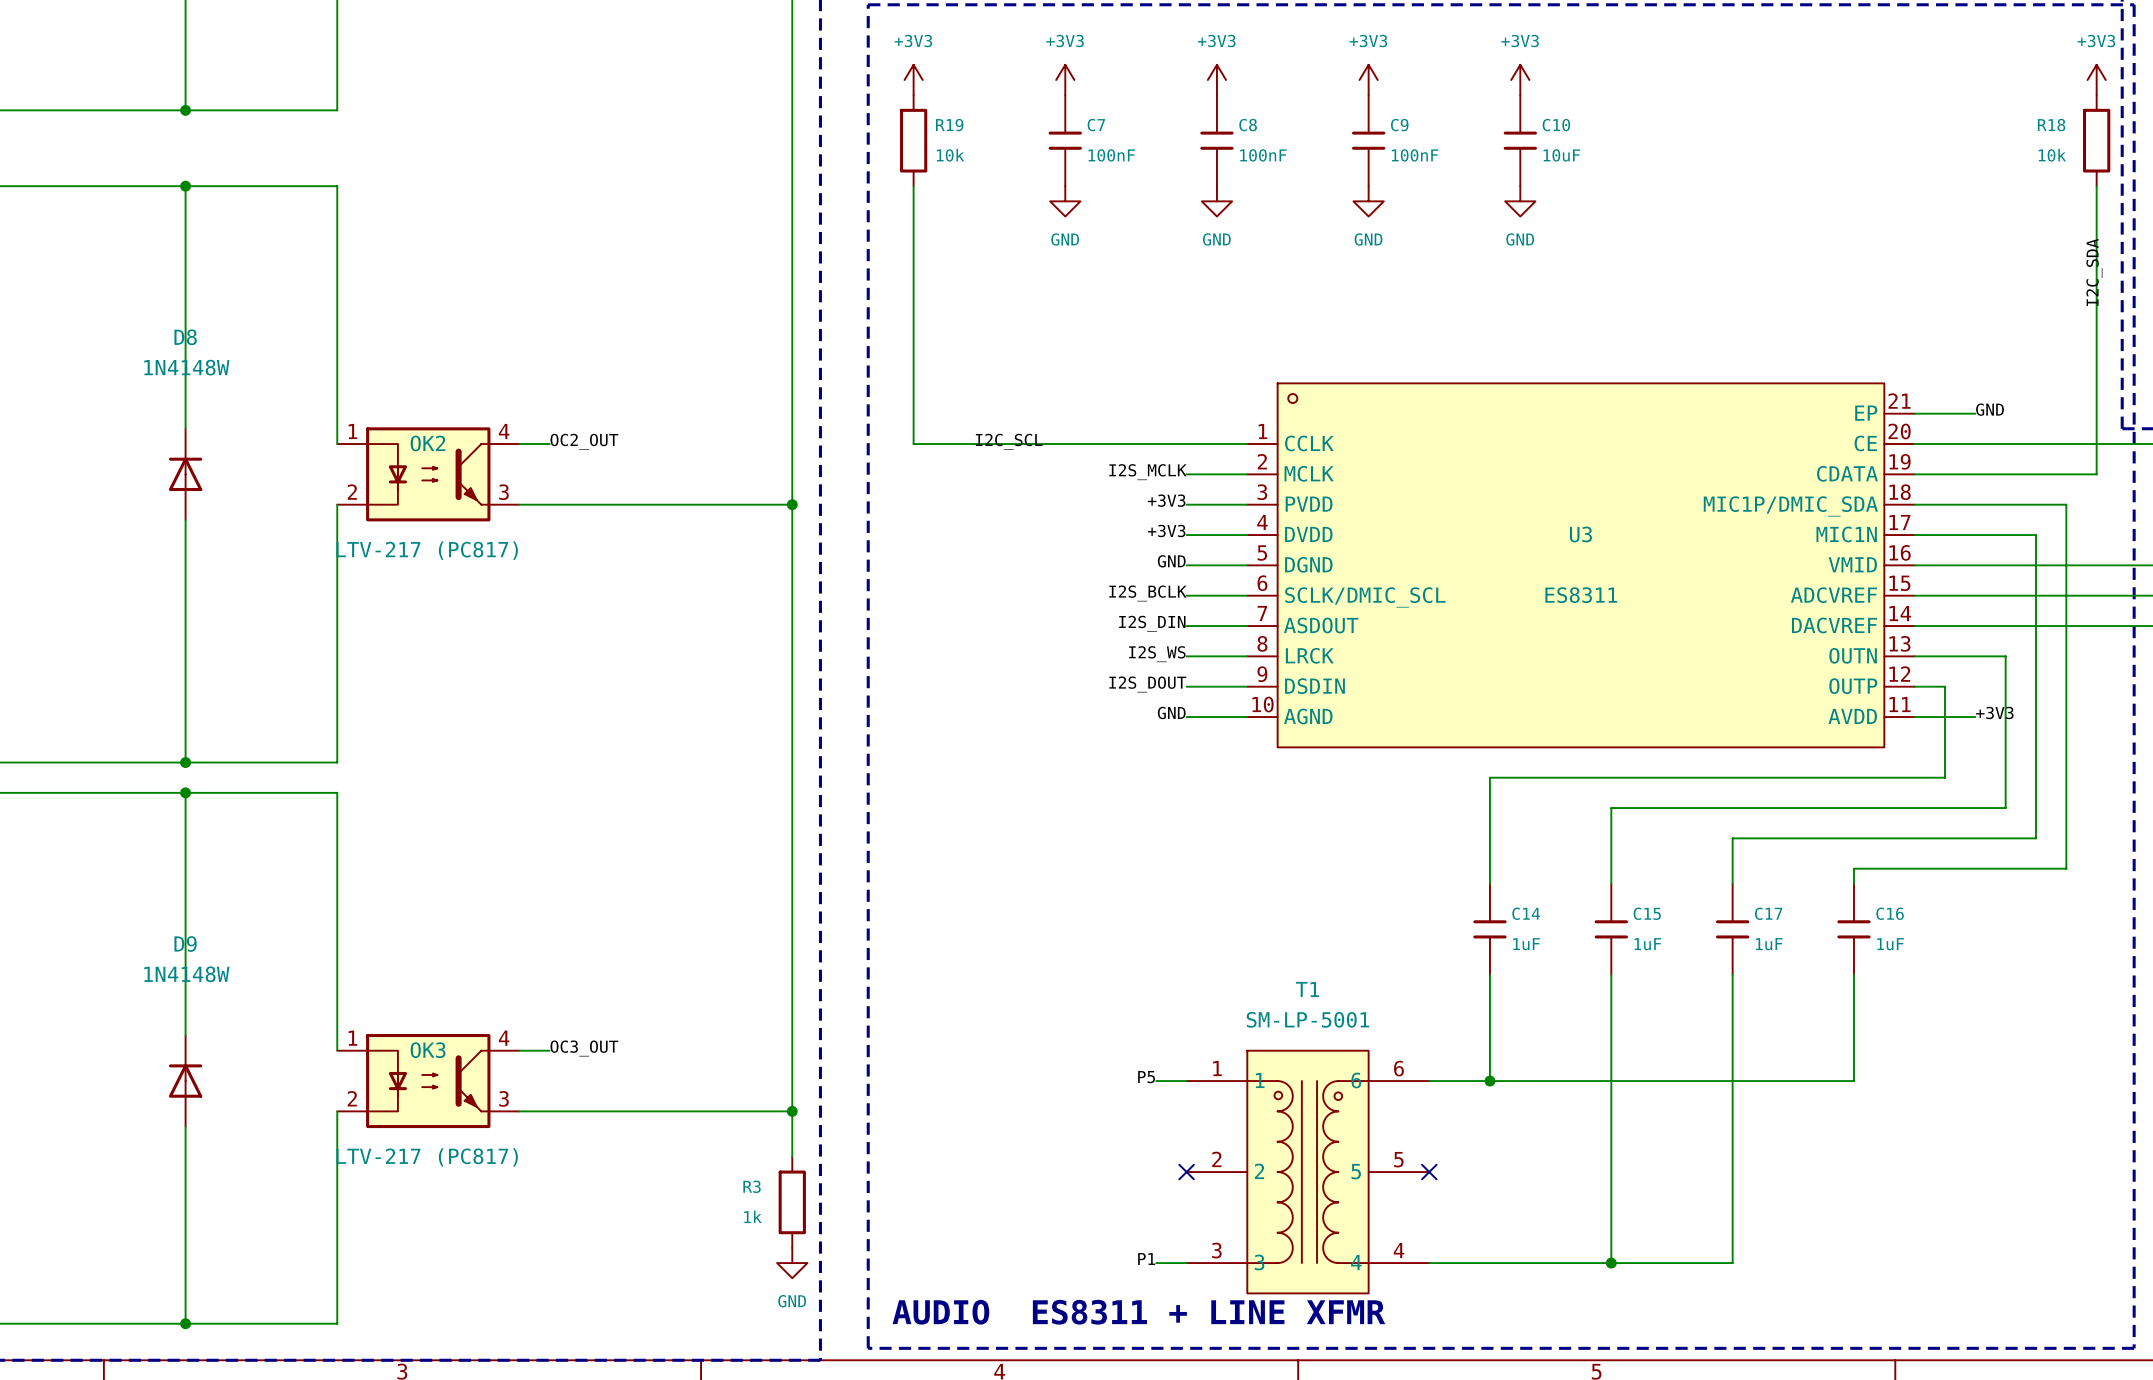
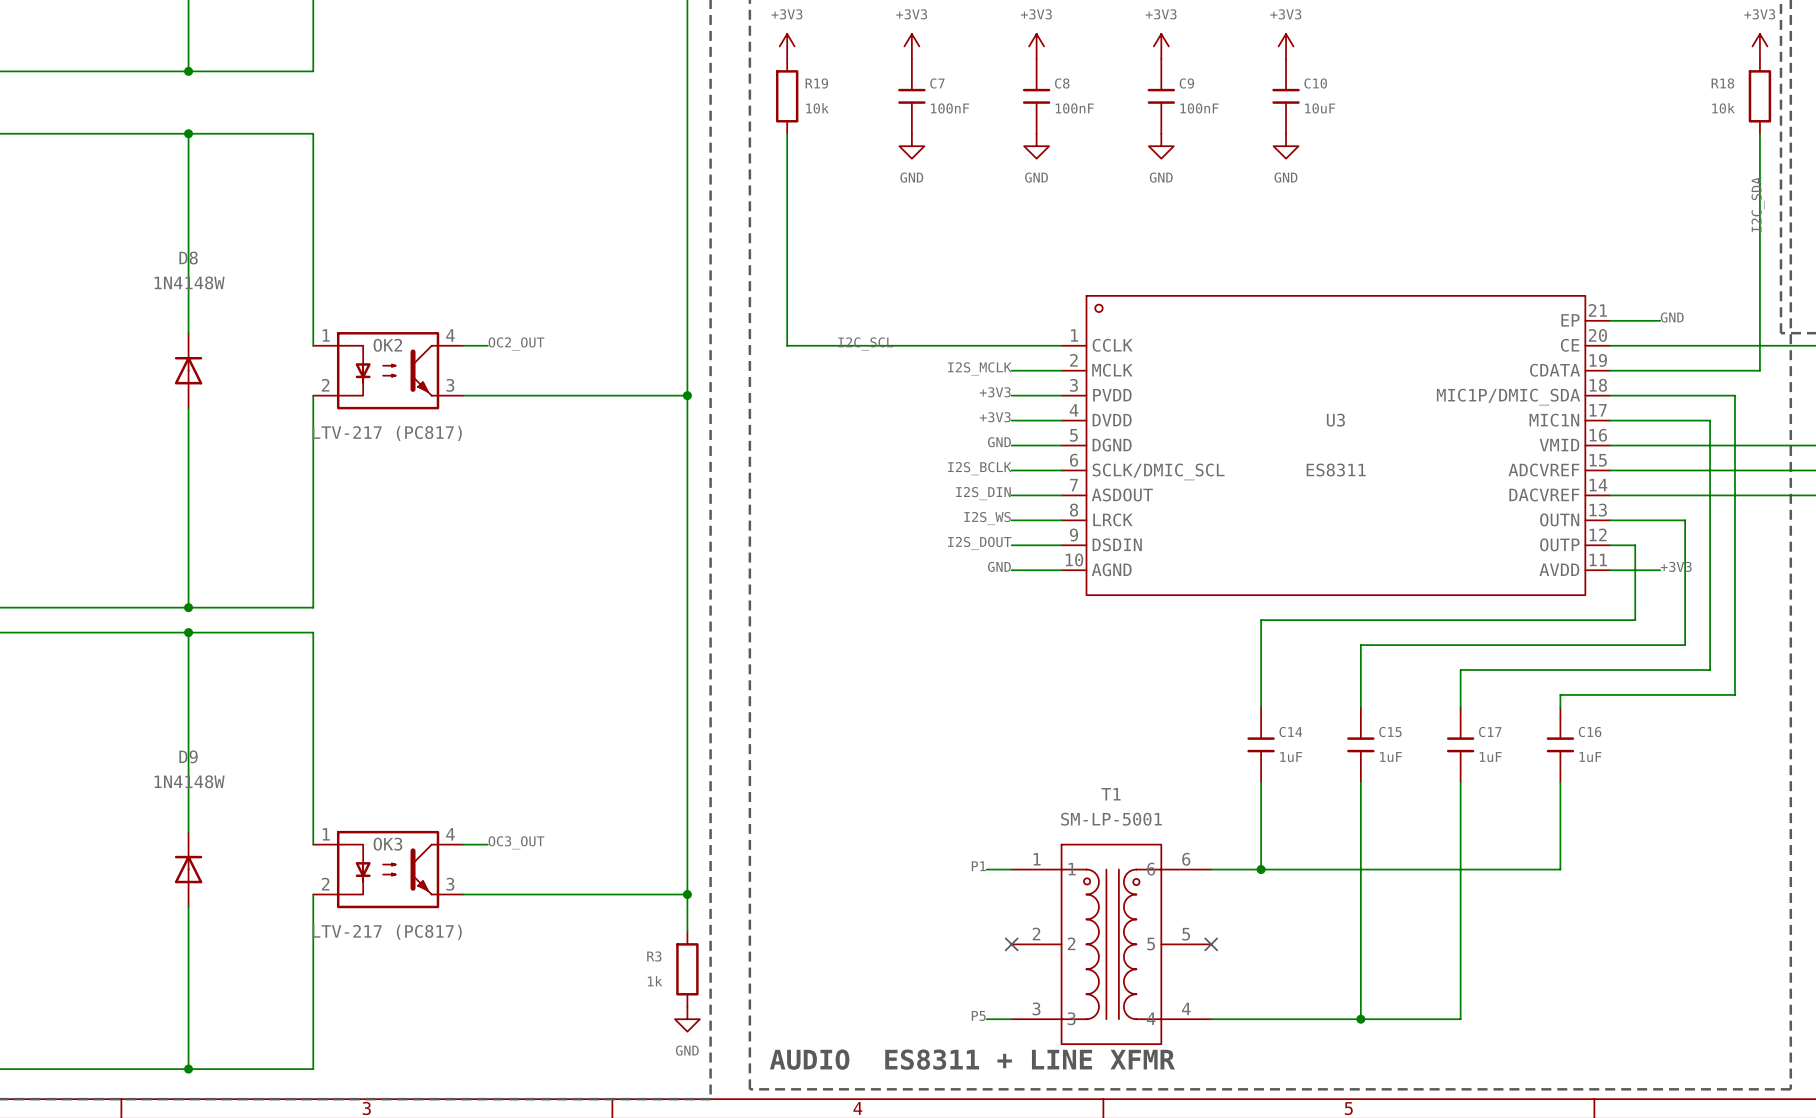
label: P5 (1146, 1077) -> P1 (978, 866)
label: P1 (1146, 1259) -> P5 (978, 1015)

